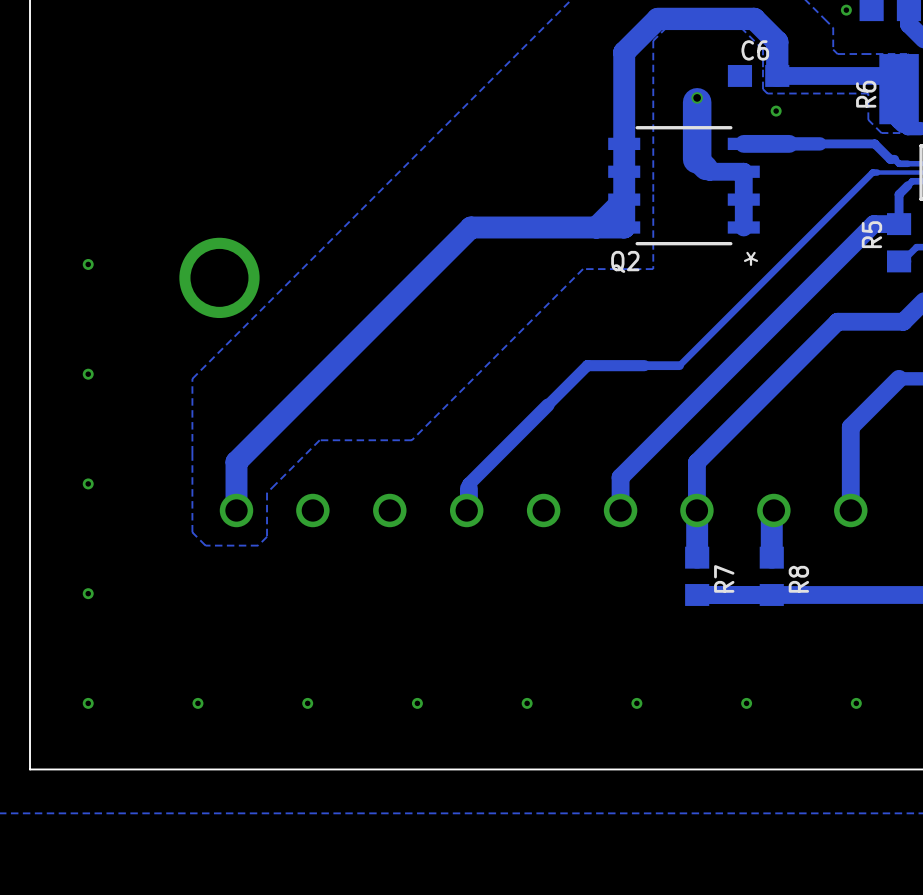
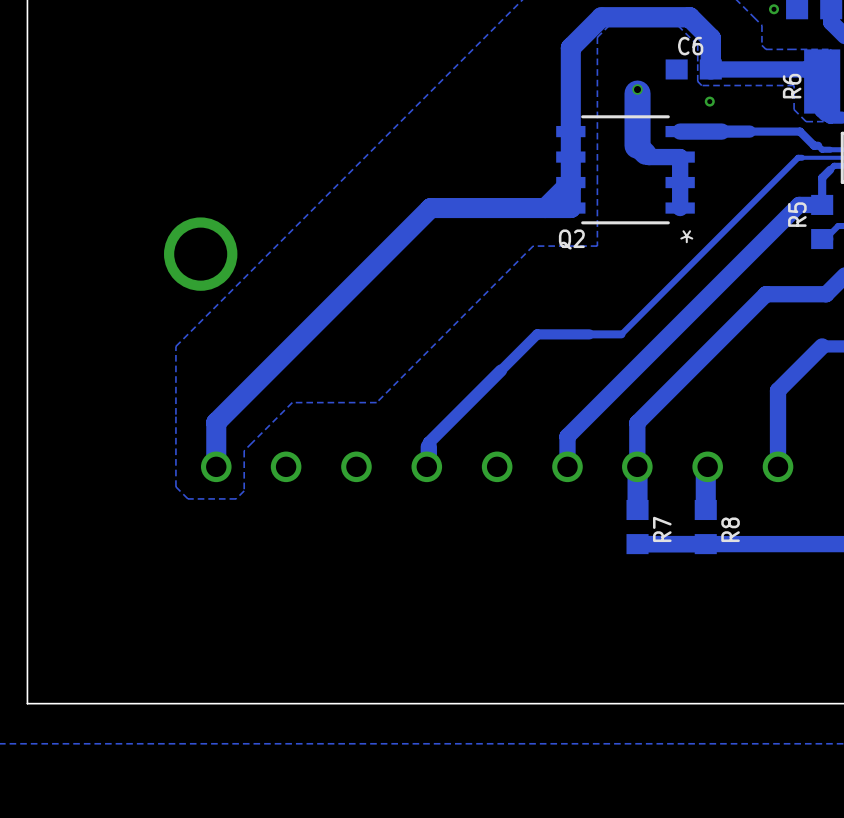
via: (88, 264) -> none
via: (88, 374) -> none
via: (88, 483) -> none
via: (88, 593) -> none
via: (88, 703) -> none
via: (197, 703) -> none
via: (307, 703) -> none
via: (417, 703) -> none
via: (527, 703) -> none
via: (636, 703) -> none
via: (746, 703) -> none
via: (856, 703) -> none

